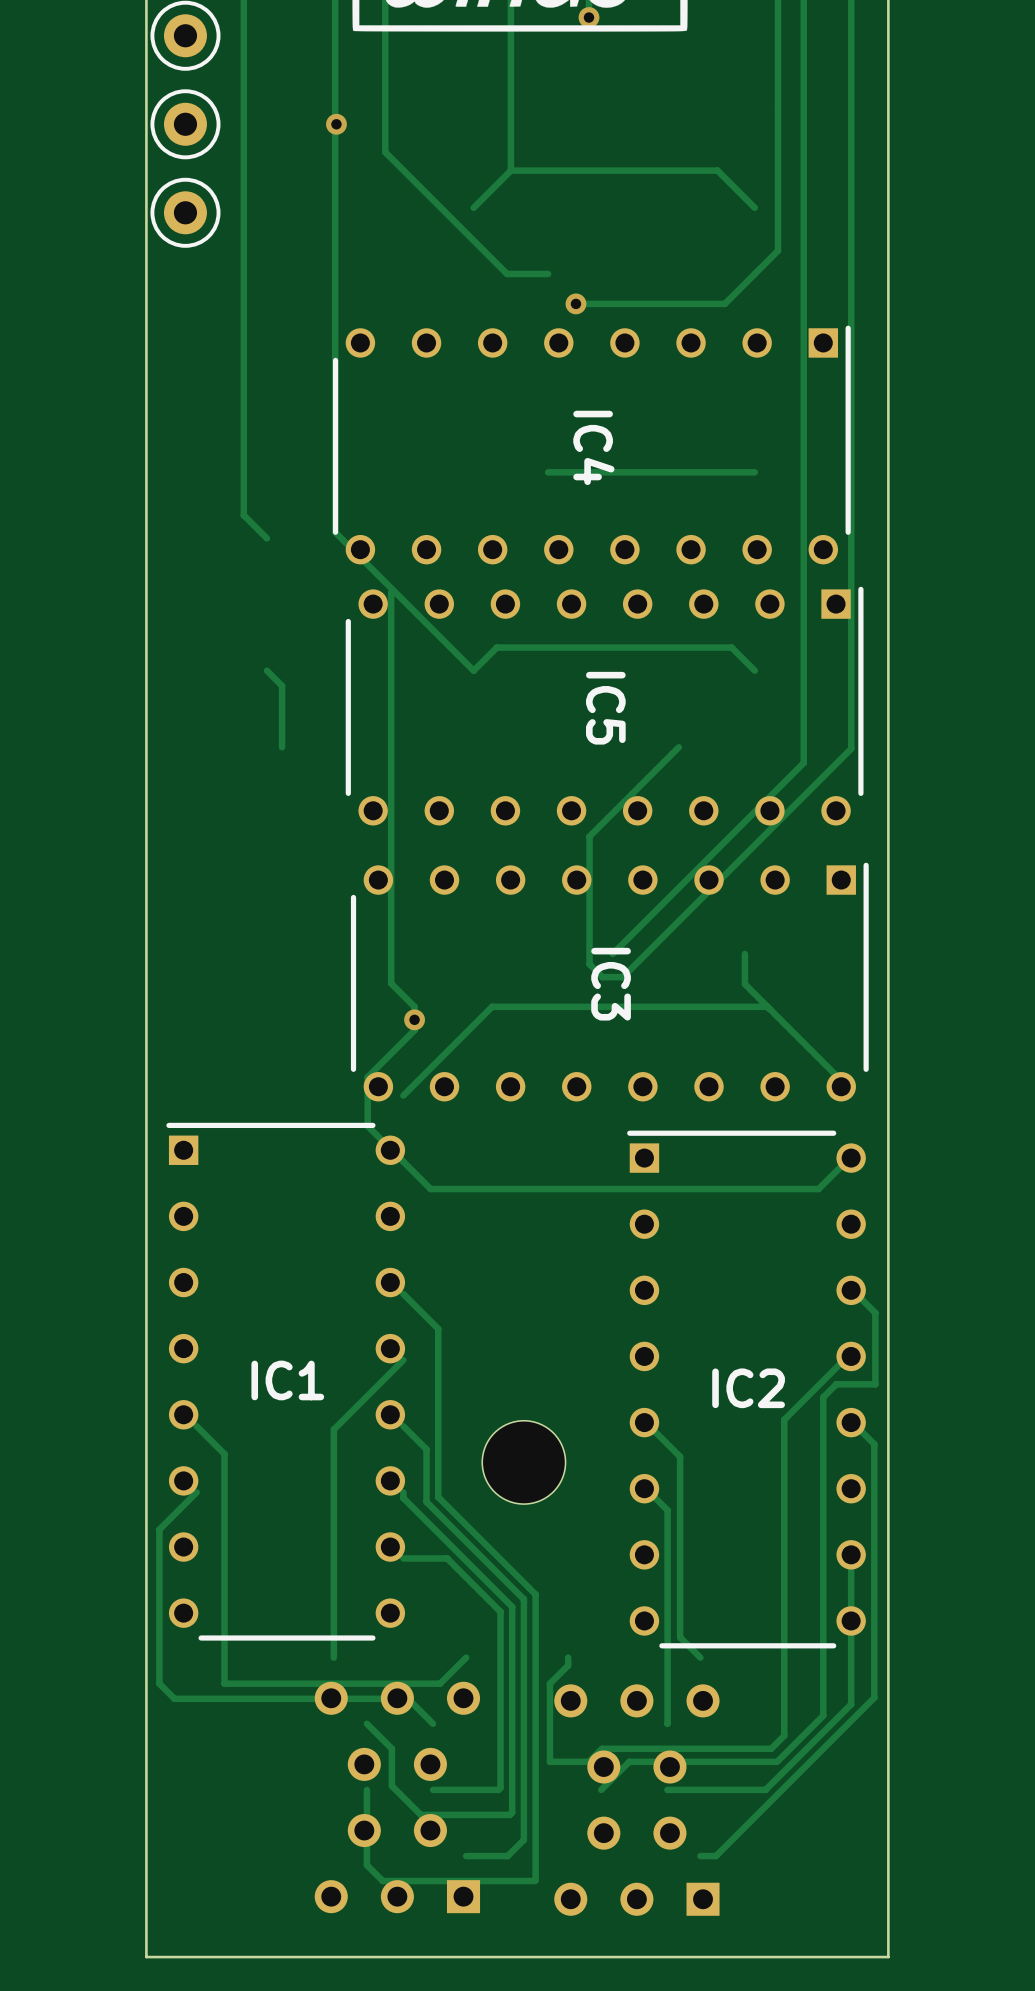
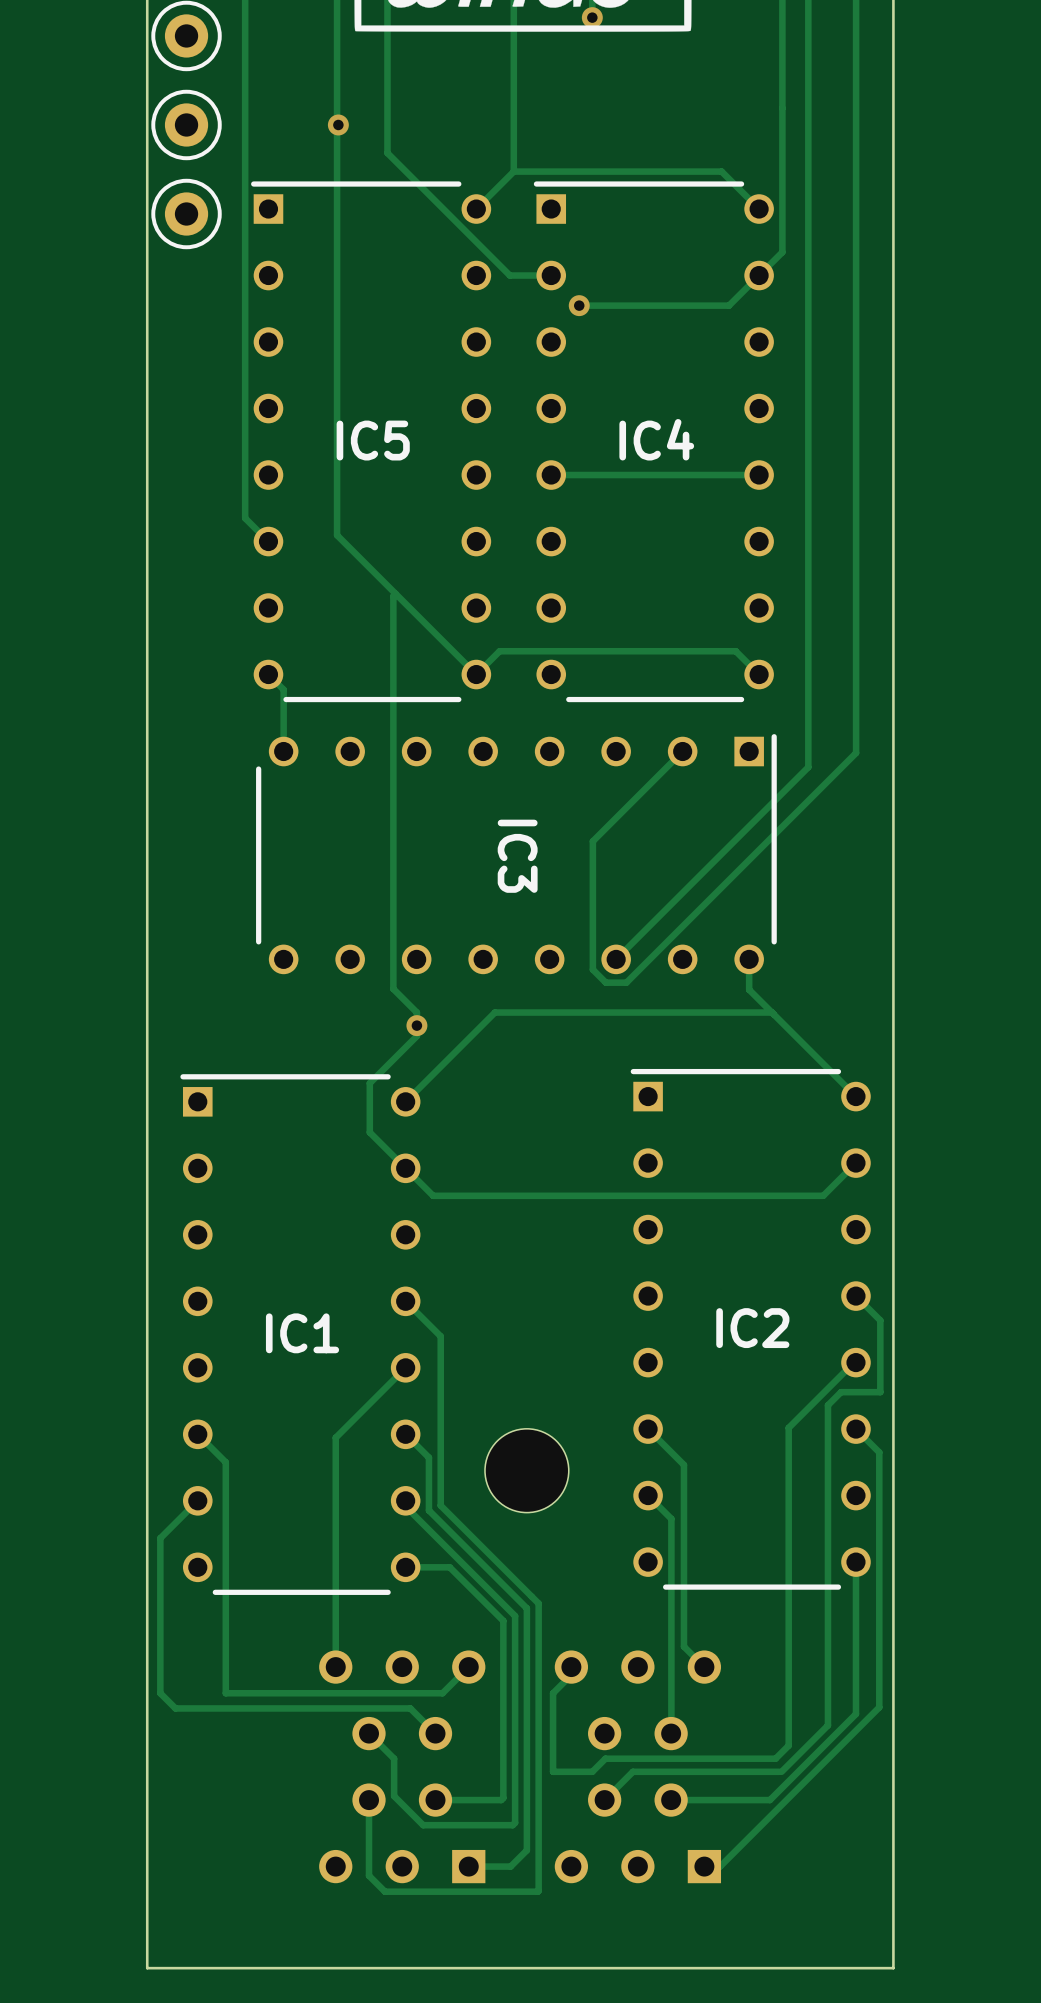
IC4 rotation: 0° (591, 445) -> 90° counterclockwise (653, 441)
IC5 rotation: 0° (604, 706) -> 90° counterclockwise (371, 441)
IC5 position: (604, 706) -> (371, 441)
IC3 position: (609, 982) -> (516, 854)
IC1 position: (285, 1381) -> (300, 1334)
IC2 position: (746, 1389) -> (750, 1329)
part position: (397, 1797) -> (402, 1766)
part position: (636, 1800) -> (637, 1766)

